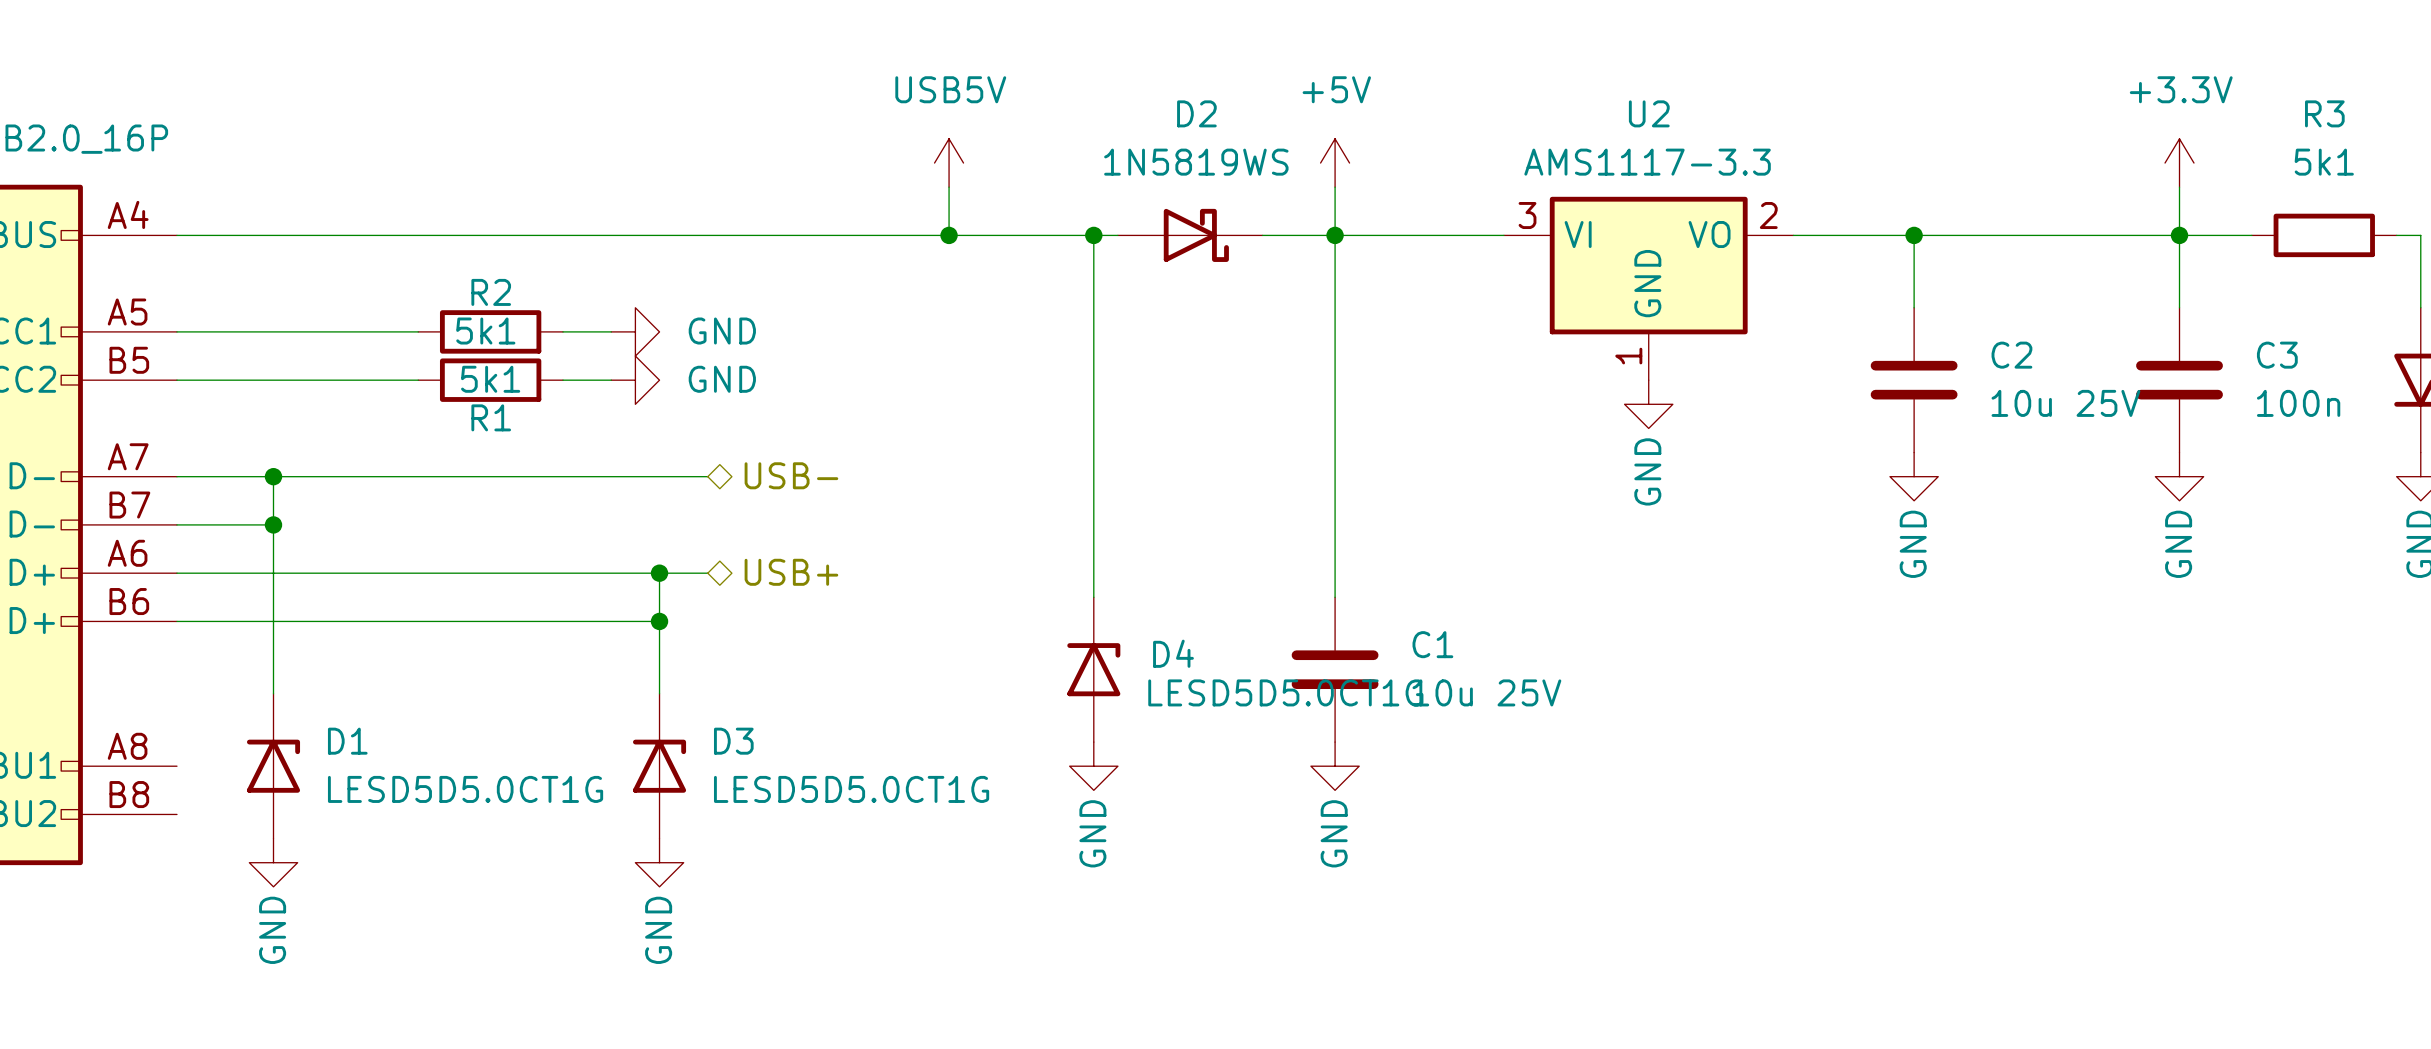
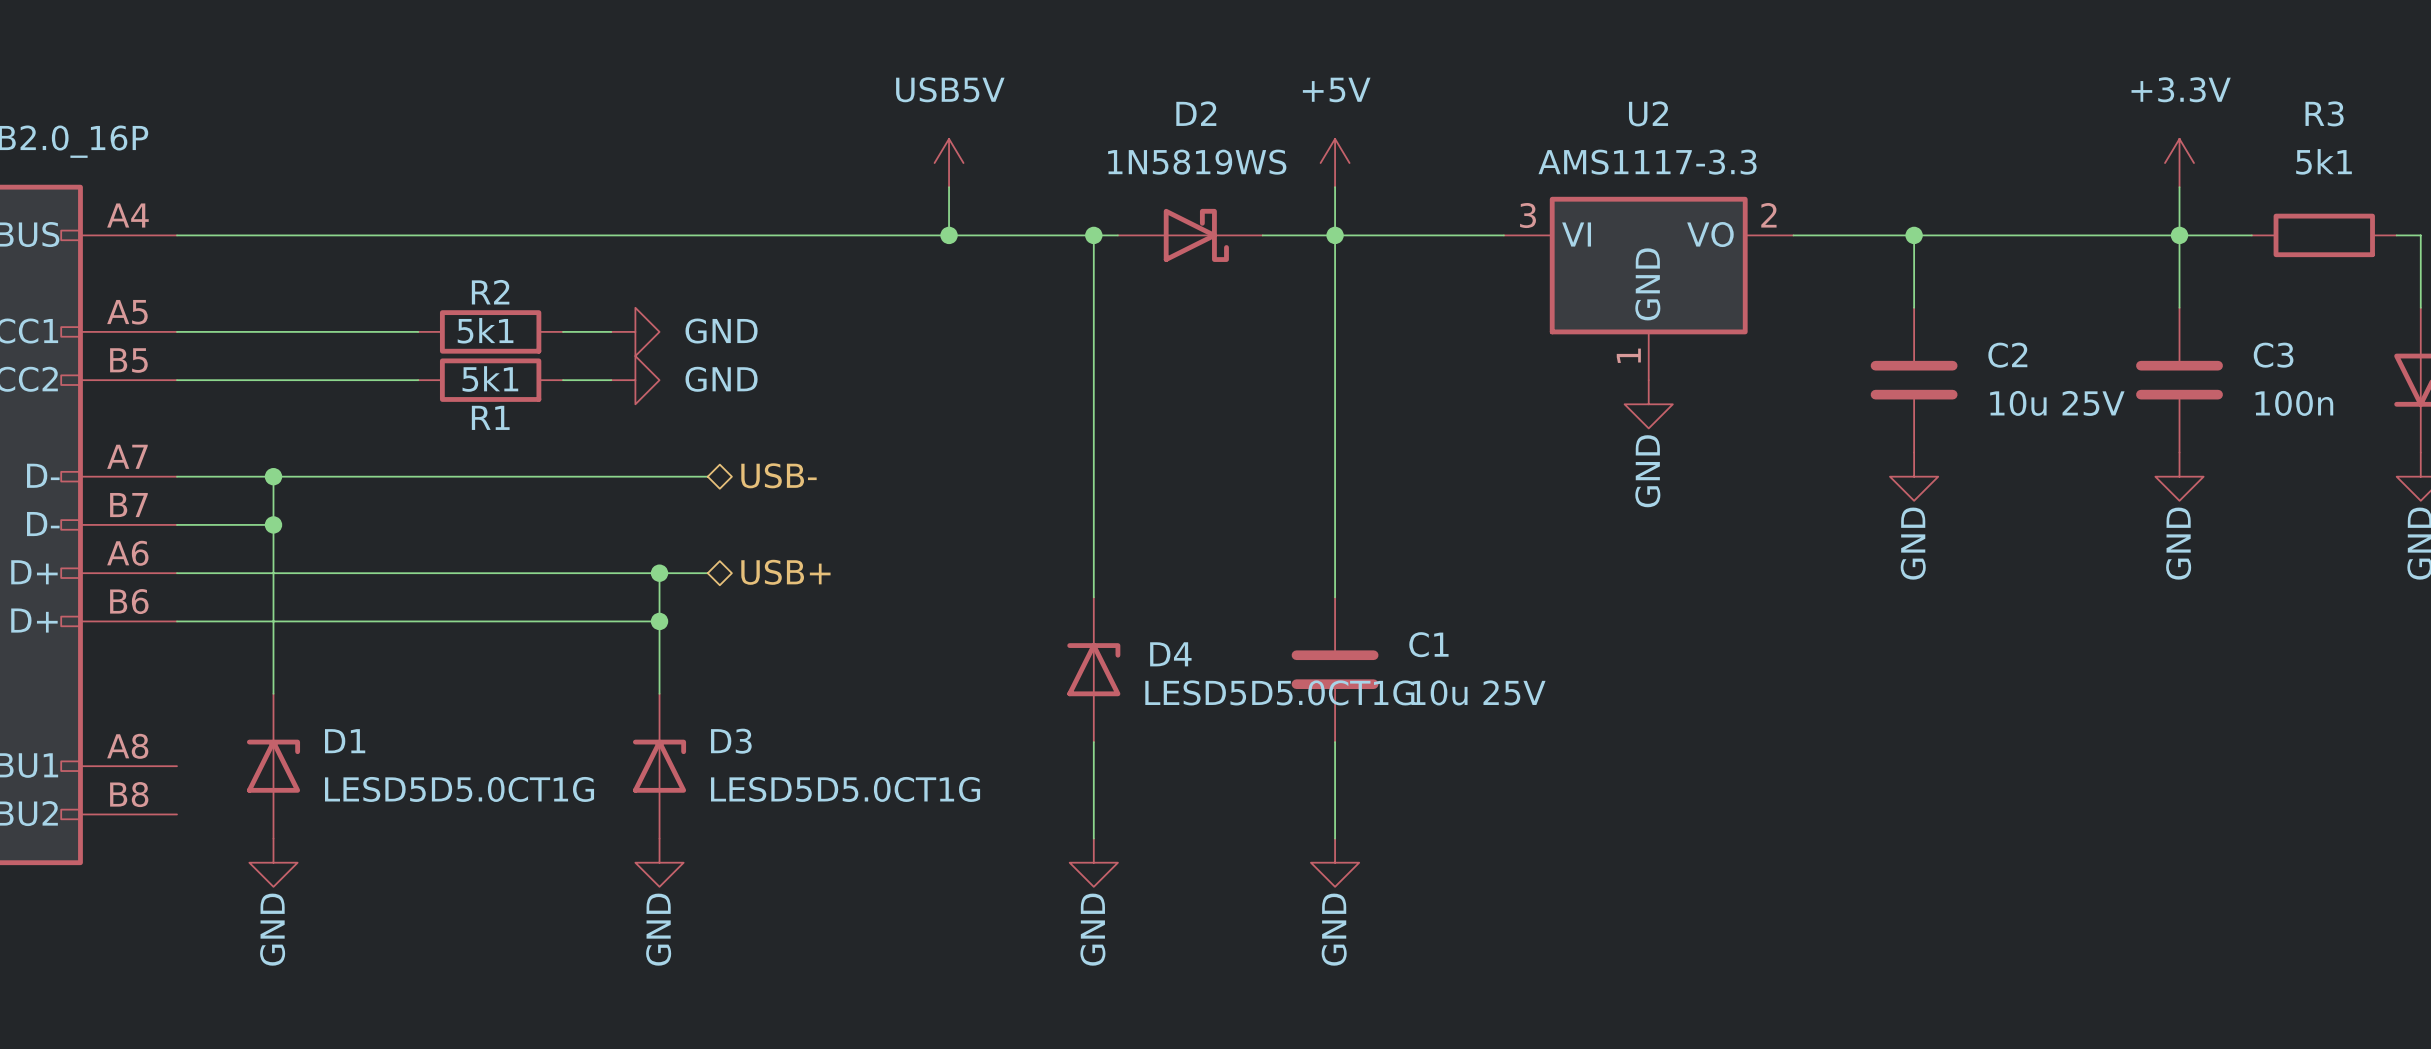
wire: none -> (1093, 742) (1093, 838)
wire: none -> (1335, 742) (1335, 838)
power symbol position: GND (1093, 766) -> GND (1093, 862)
power symbol position: GND (1335, 766) -> GND (1335, 862)

